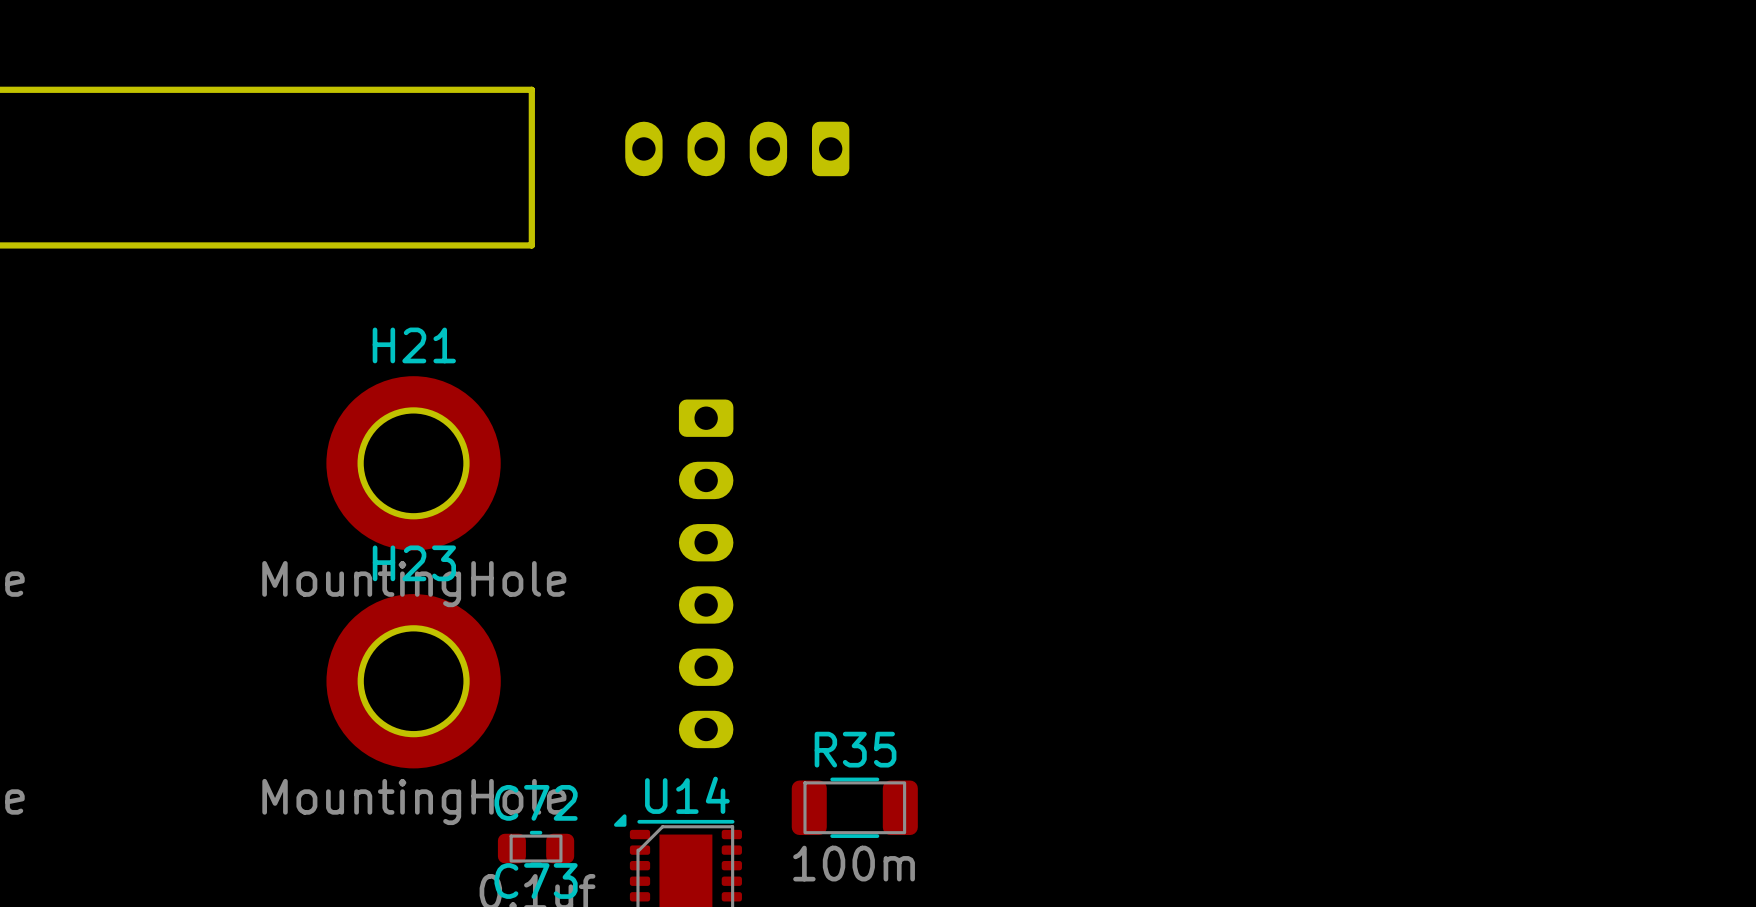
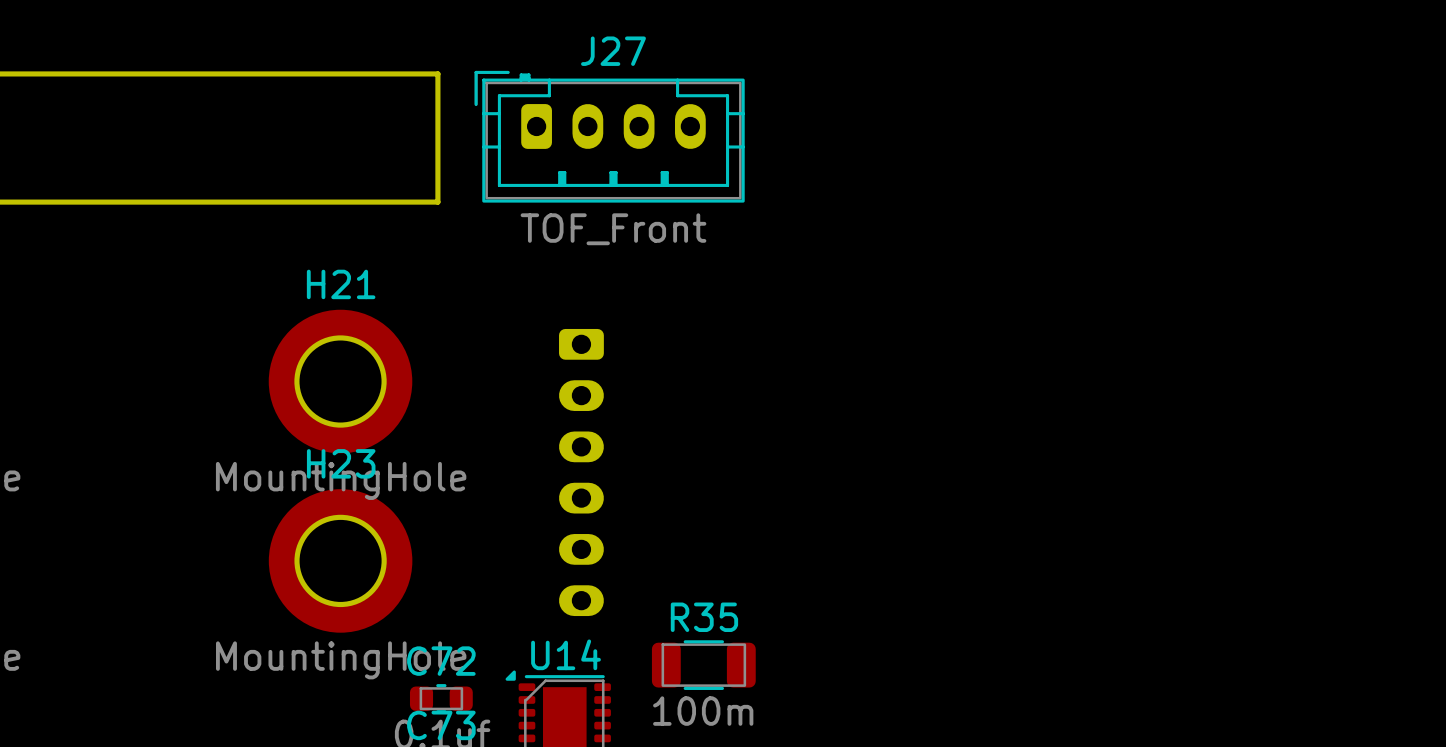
J27 side: bottom (737, 148) -> top (609, 136)

